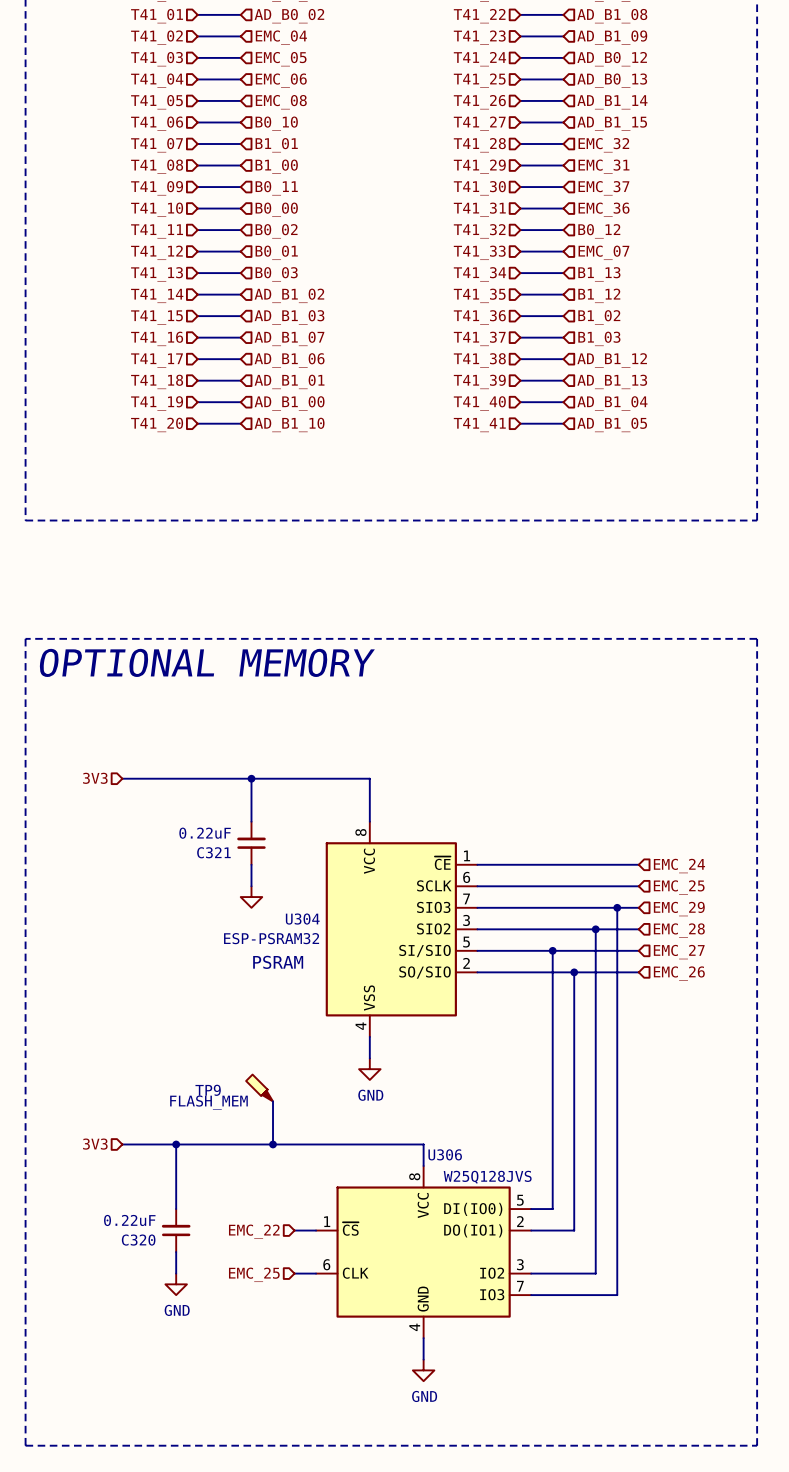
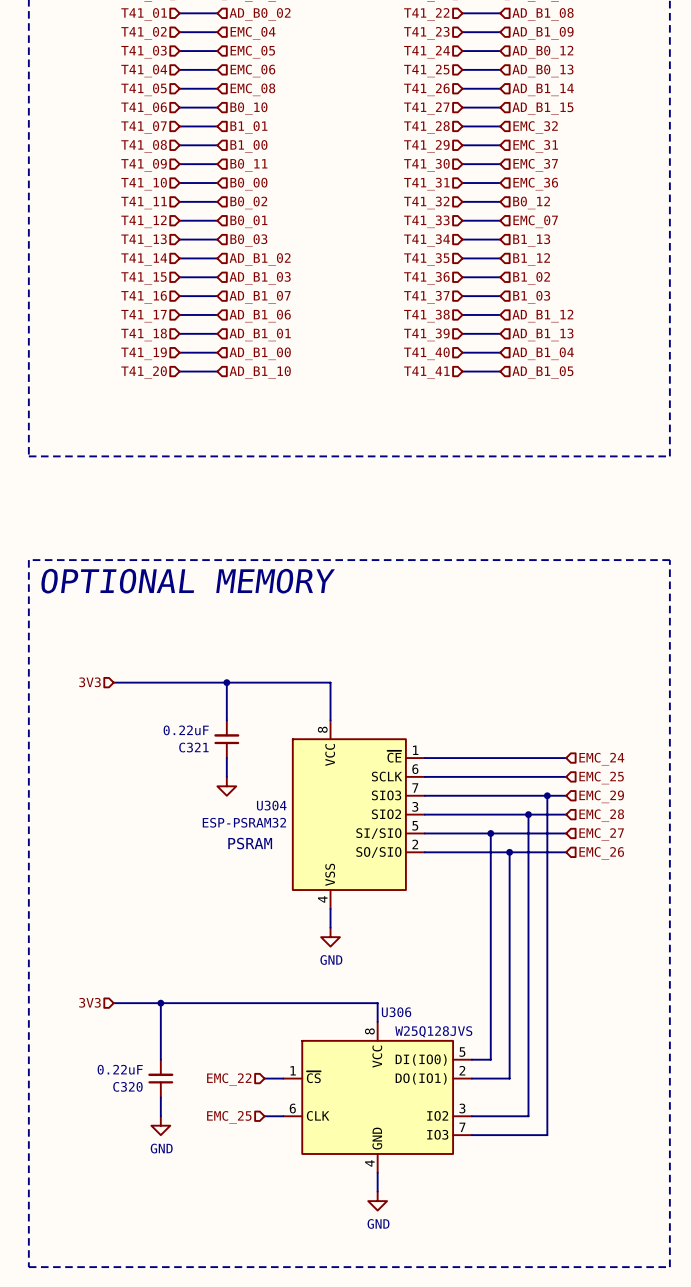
TP9: FLASH_MEM (259, 1088) -> none
wire: (273, 1101) (273, 1144) -> none
junction: (273, 1144) -> none

